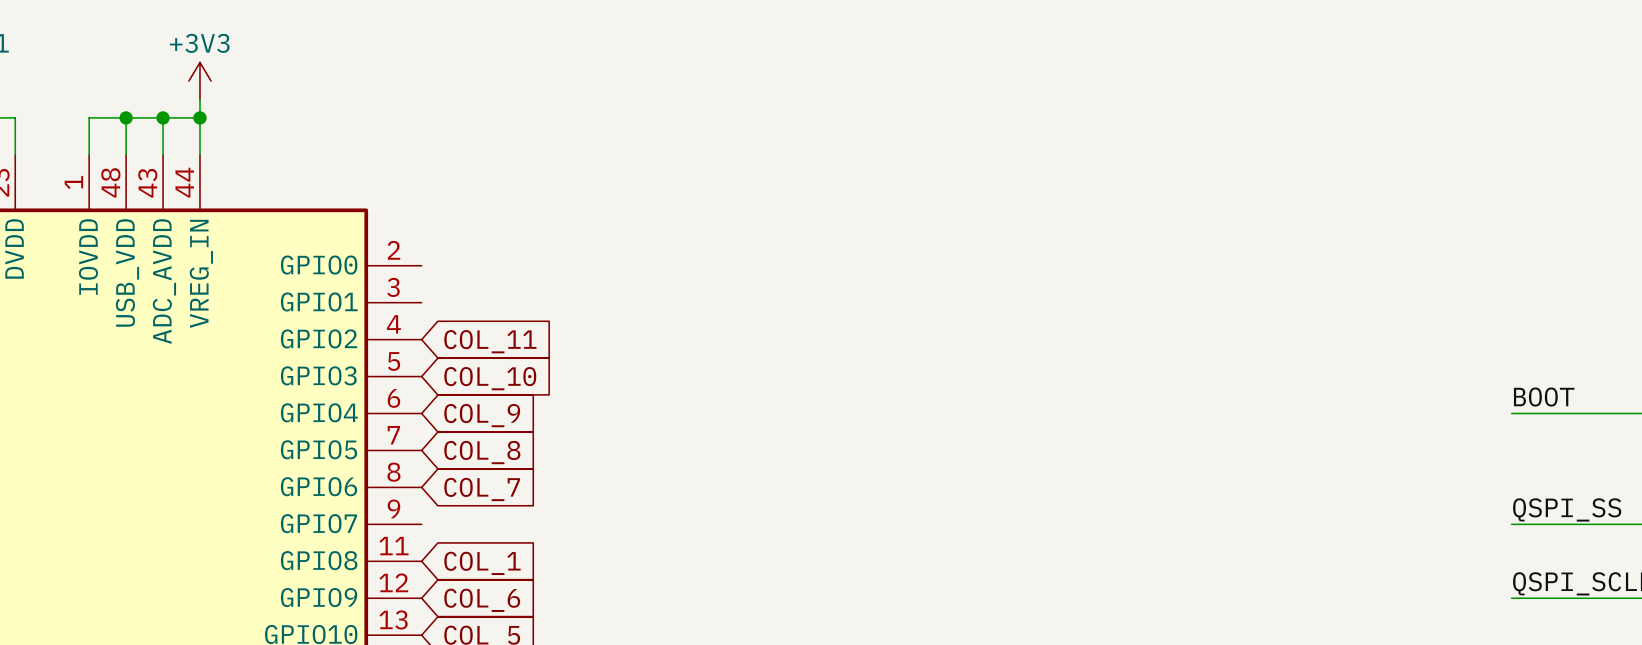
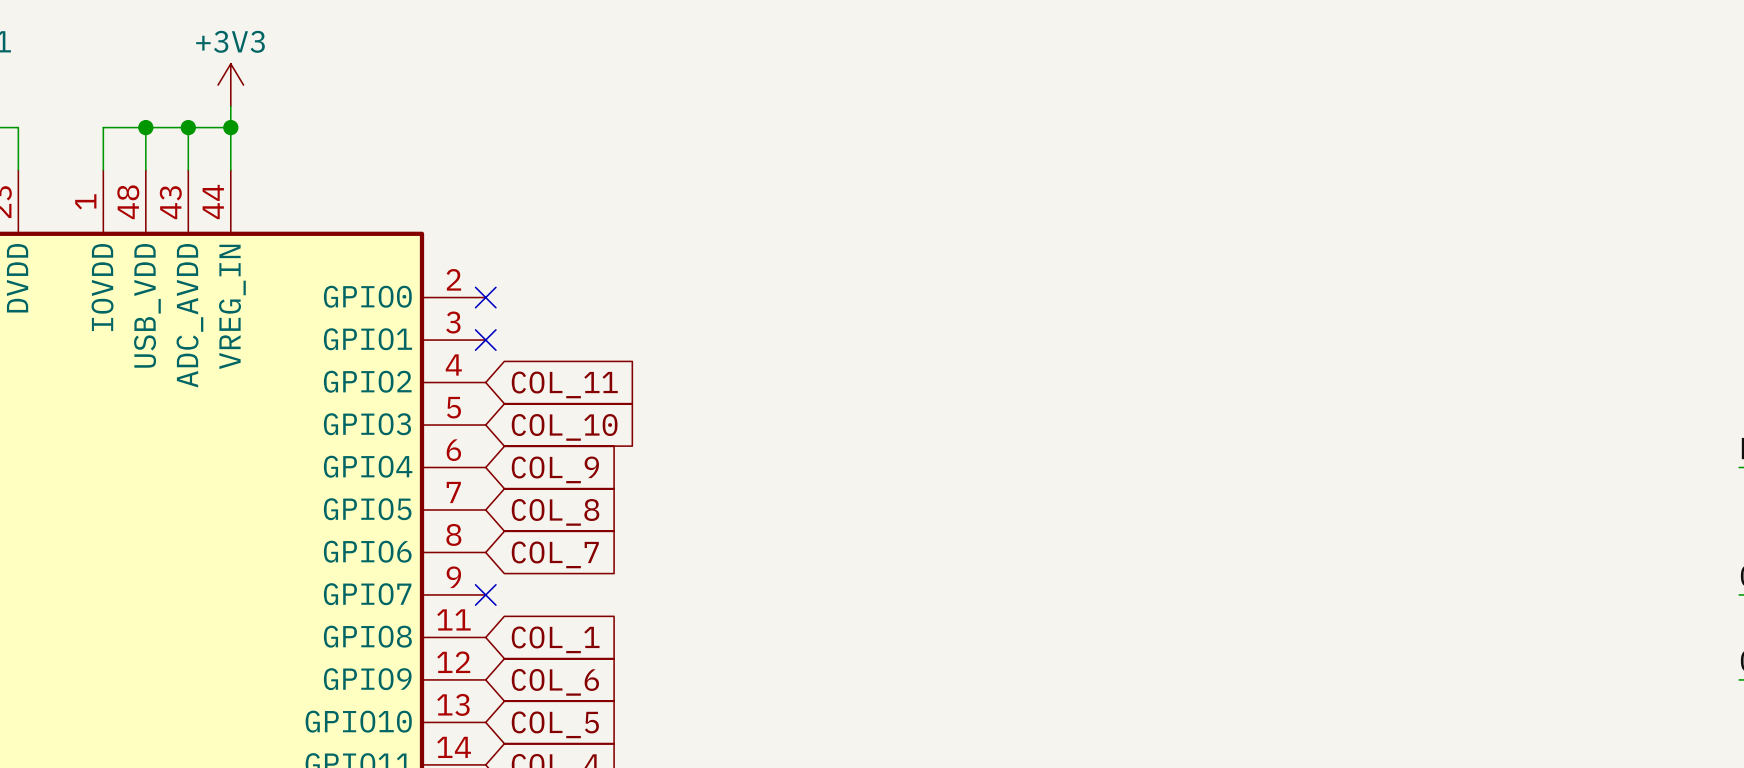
no-connect mark: none -> (485, 297)
no-connect mark: none -> (485, 340)
no-connect mark: none -> (485, 594)

